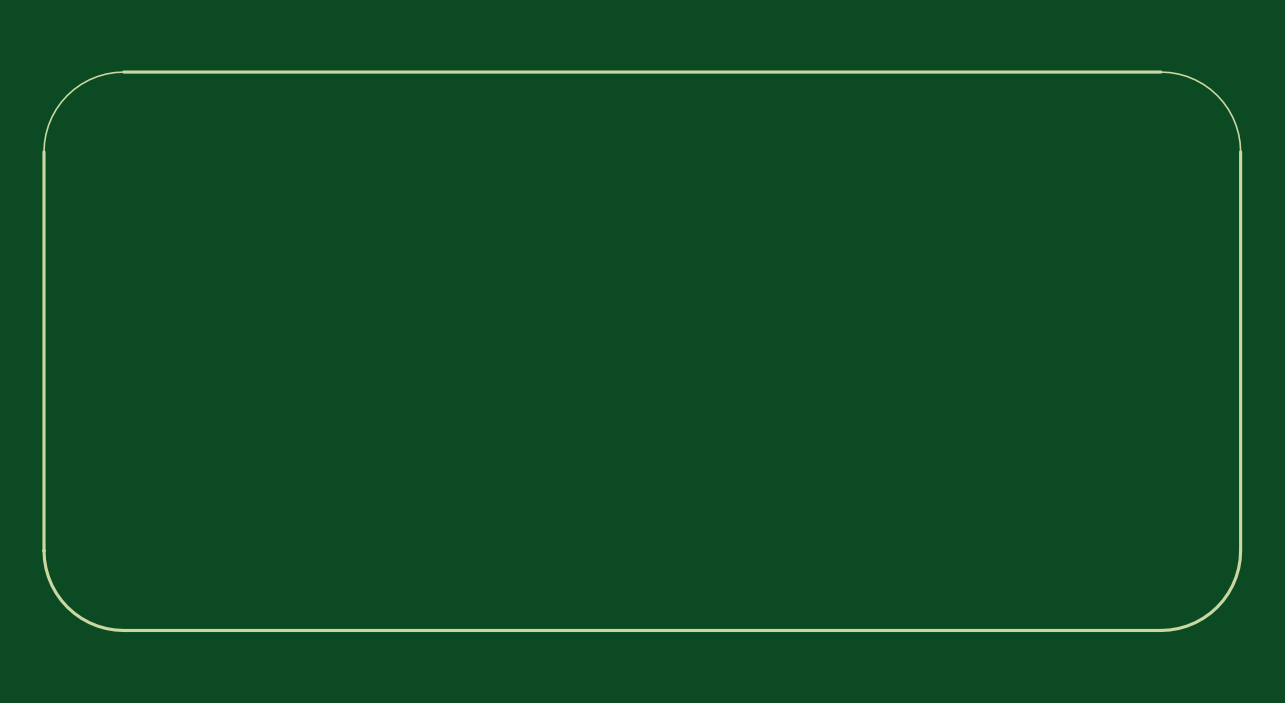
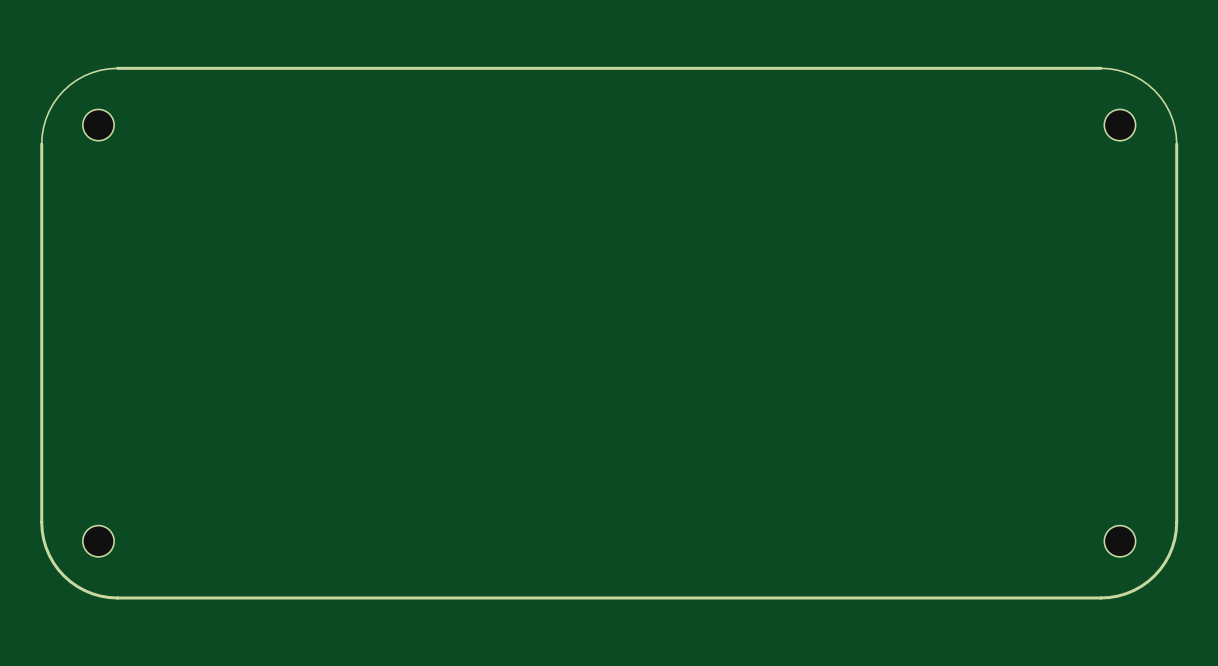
part: none -> (98, 125)
part: none -> (1119, 125)
part: none -> (98, 541)
part: none -> (1119, 541)

